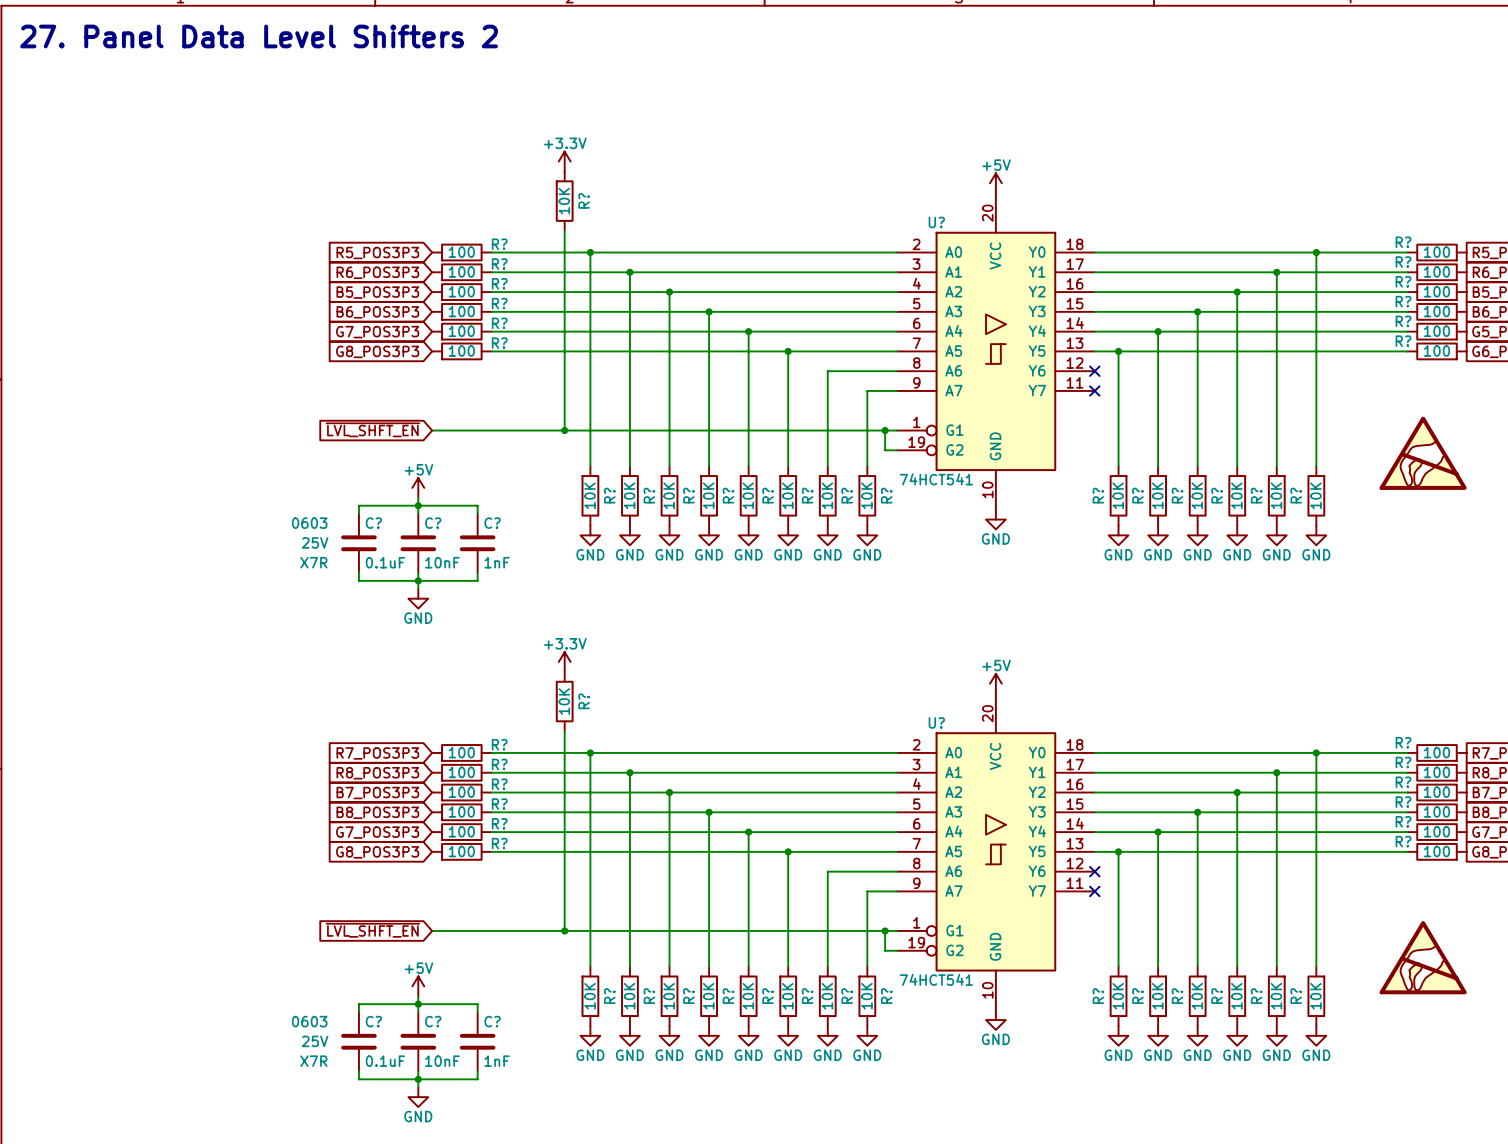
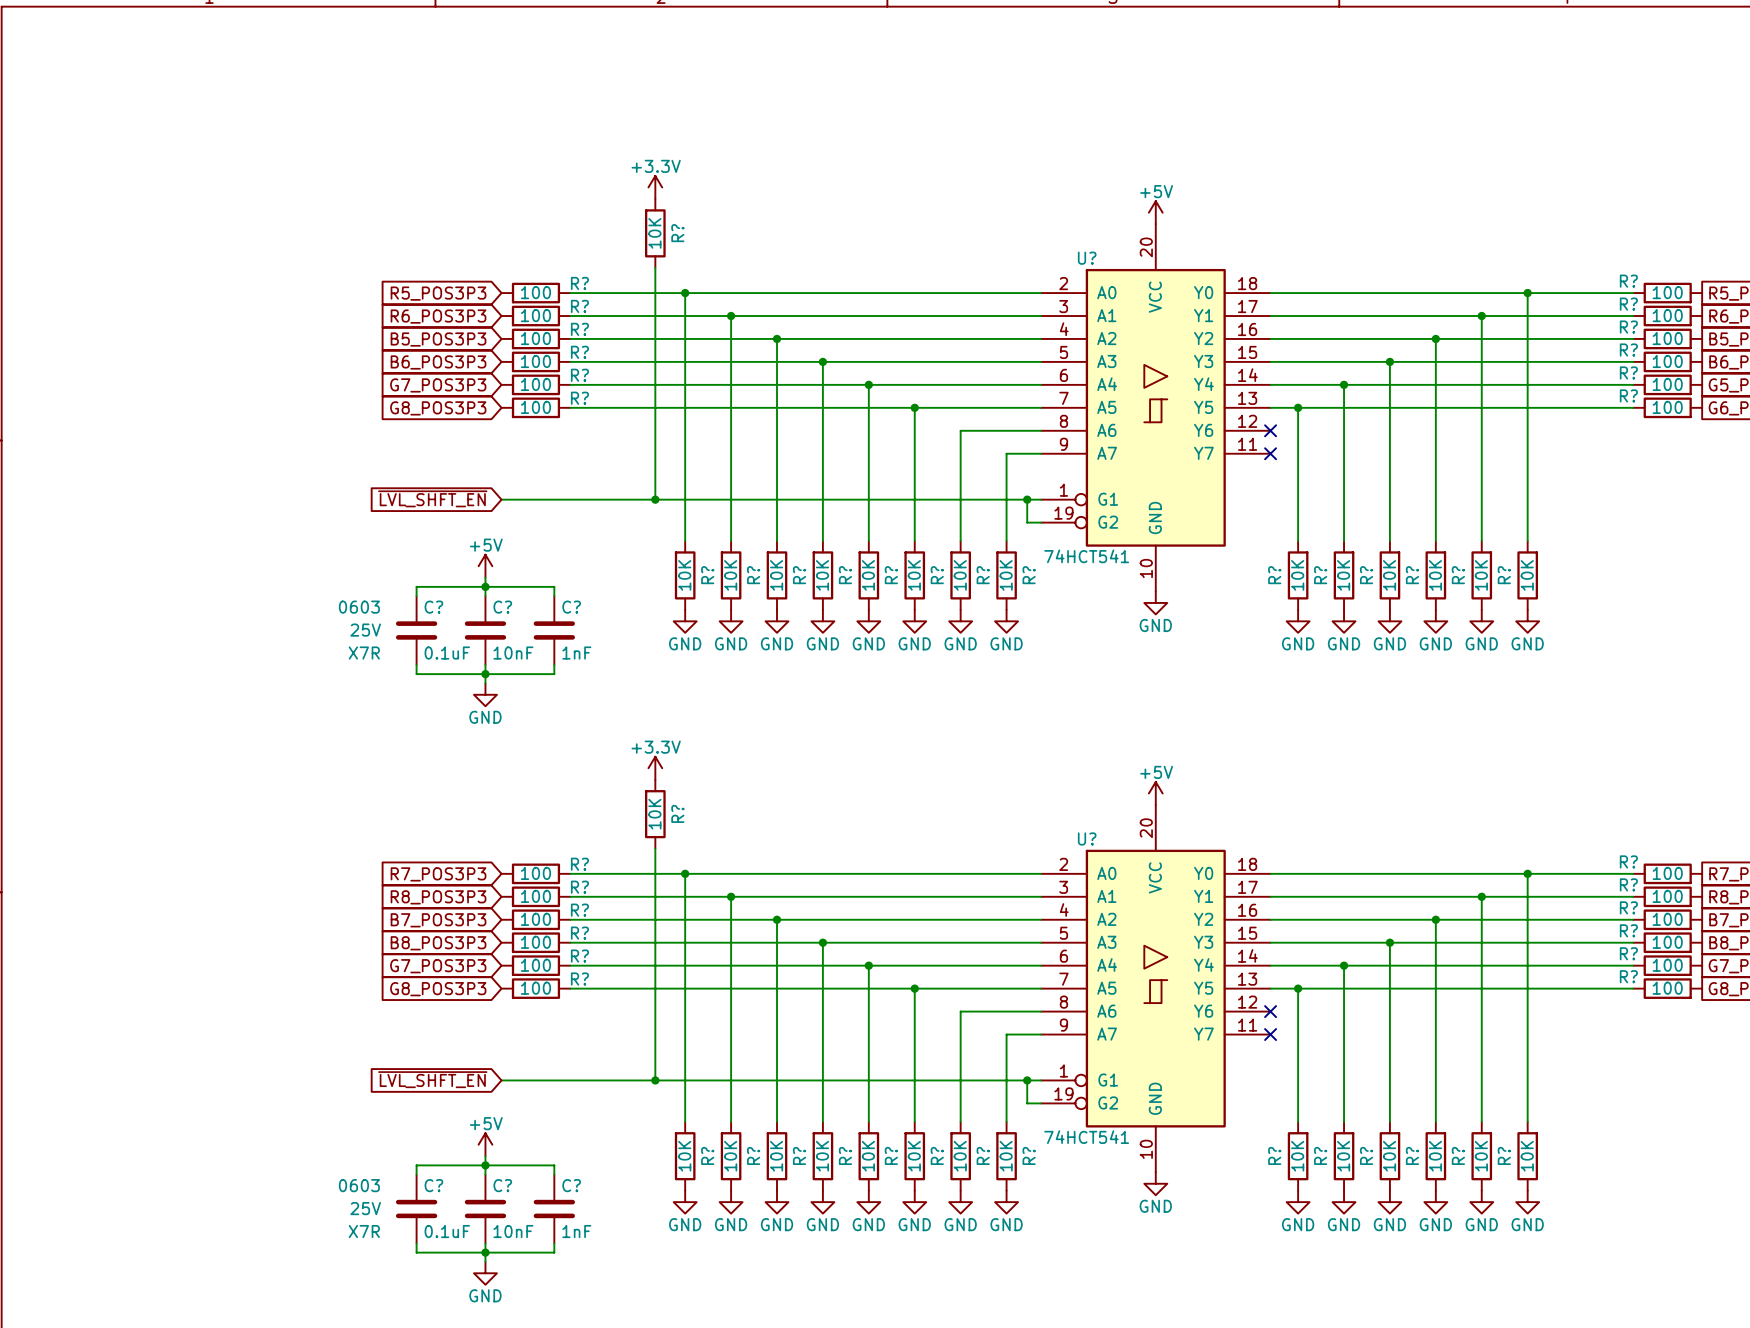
text: 27. Panel Data Level Shifters 2 (259, 36) -> none
power symbol: (1423, 453) -> none
power symbol: (1423, 957) -> none

